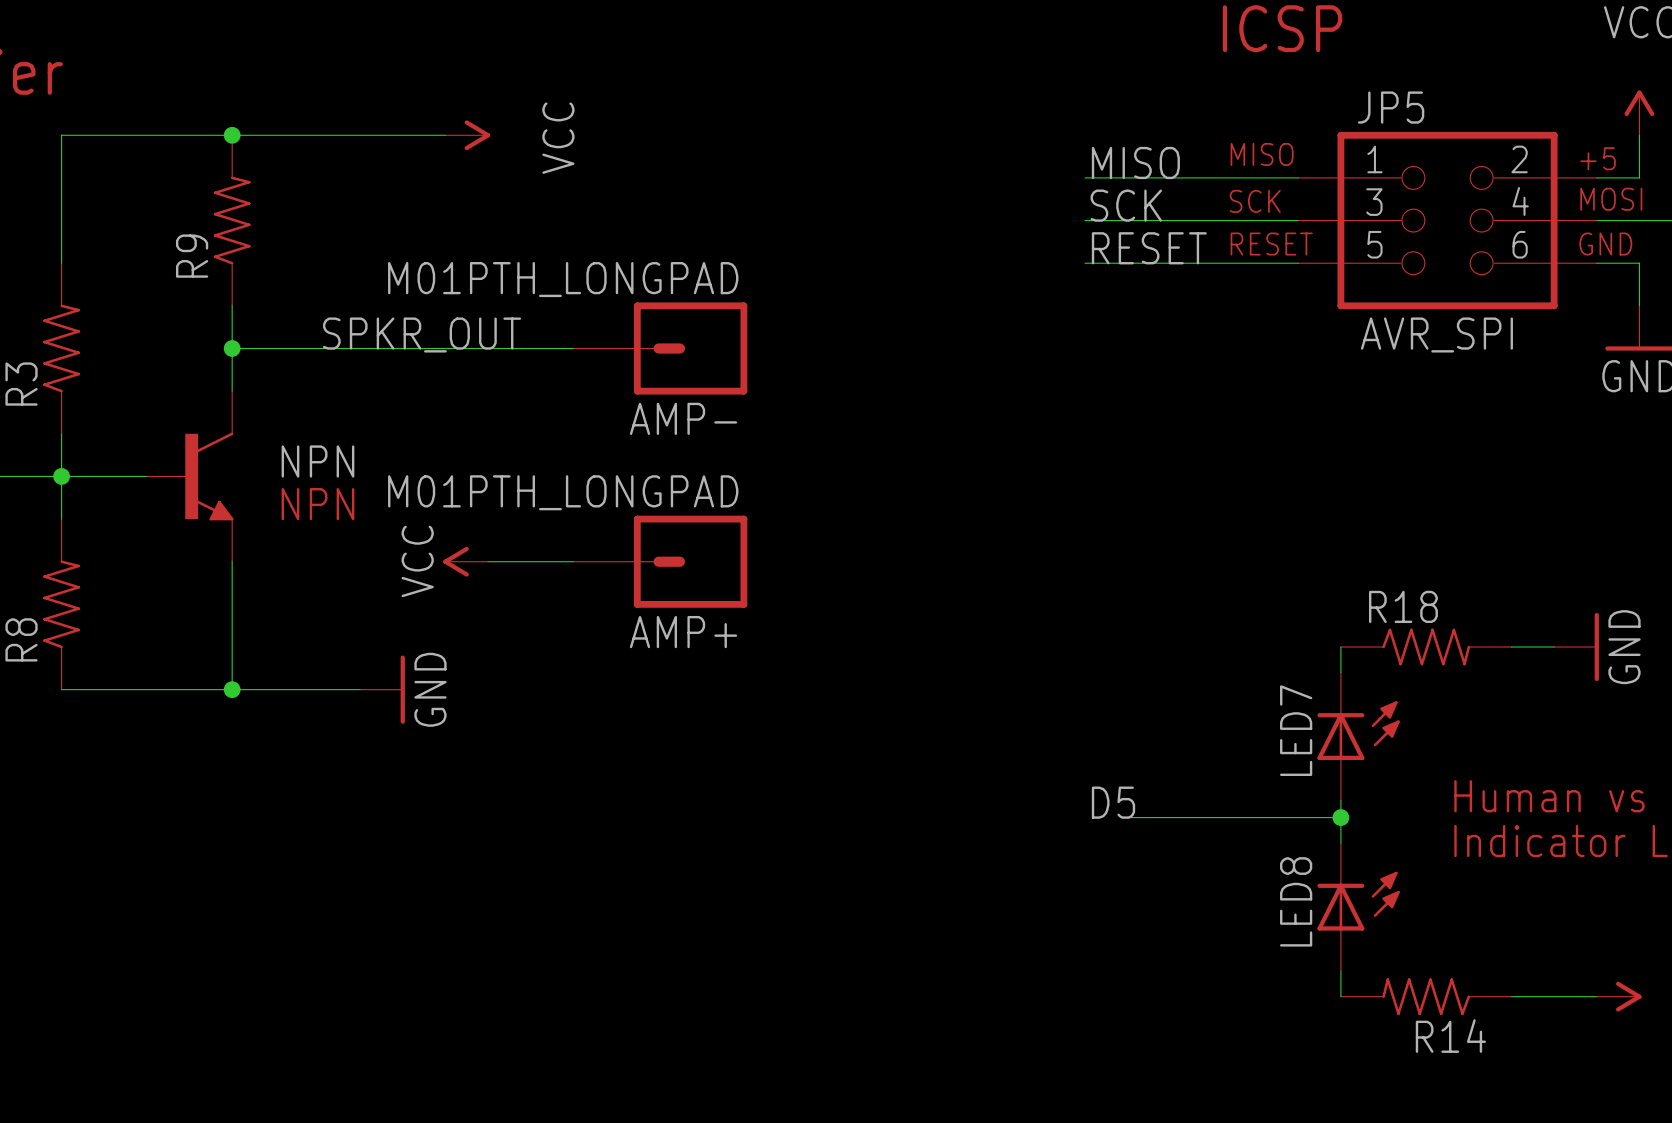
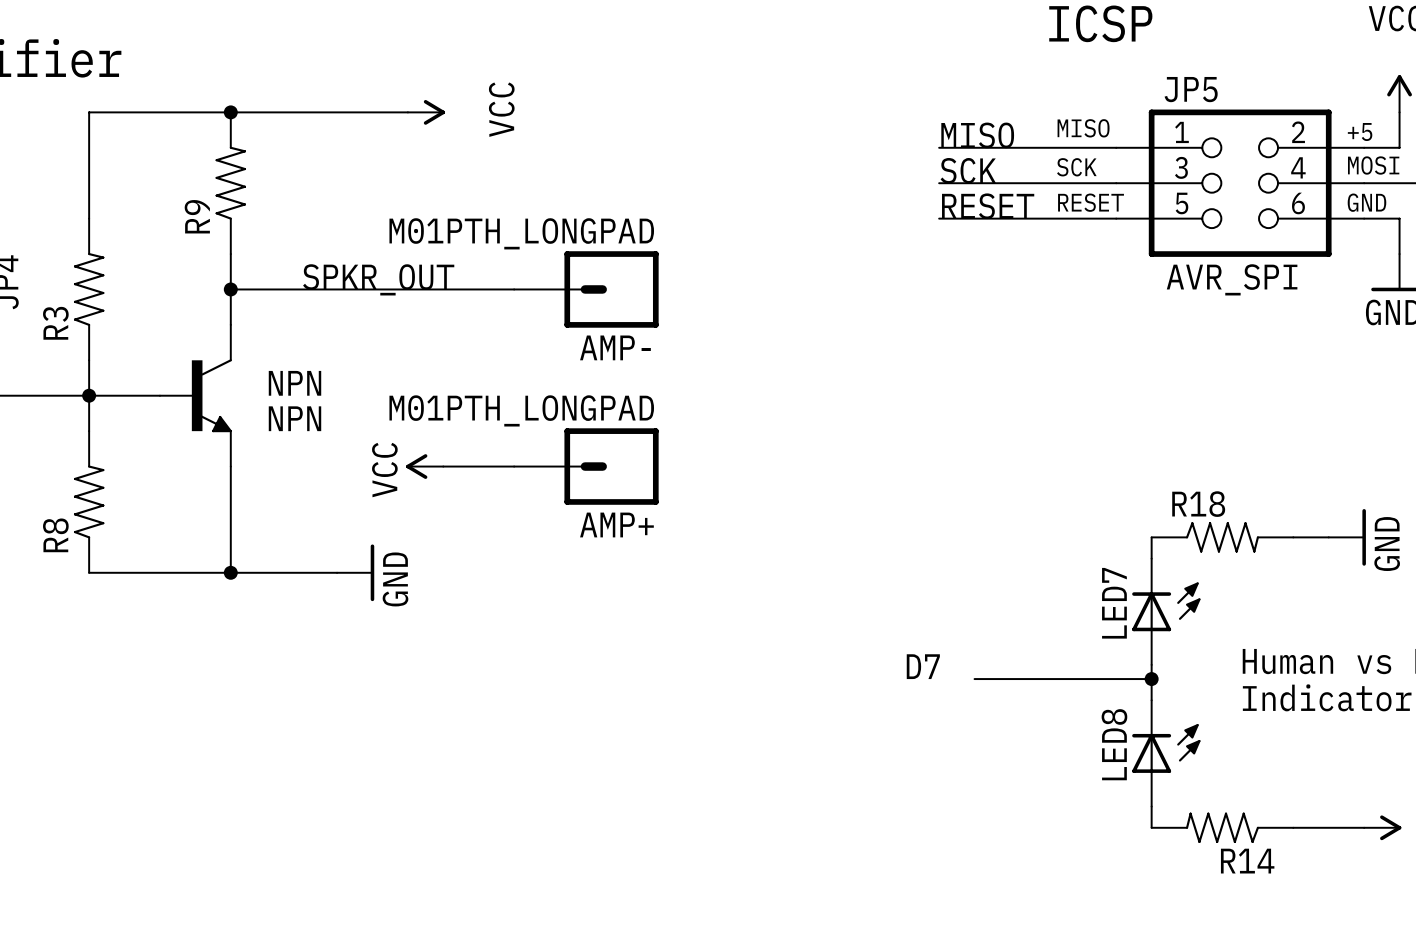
label: none -> D7 (923, 666)
label: D5 (1113, 802) -> none

